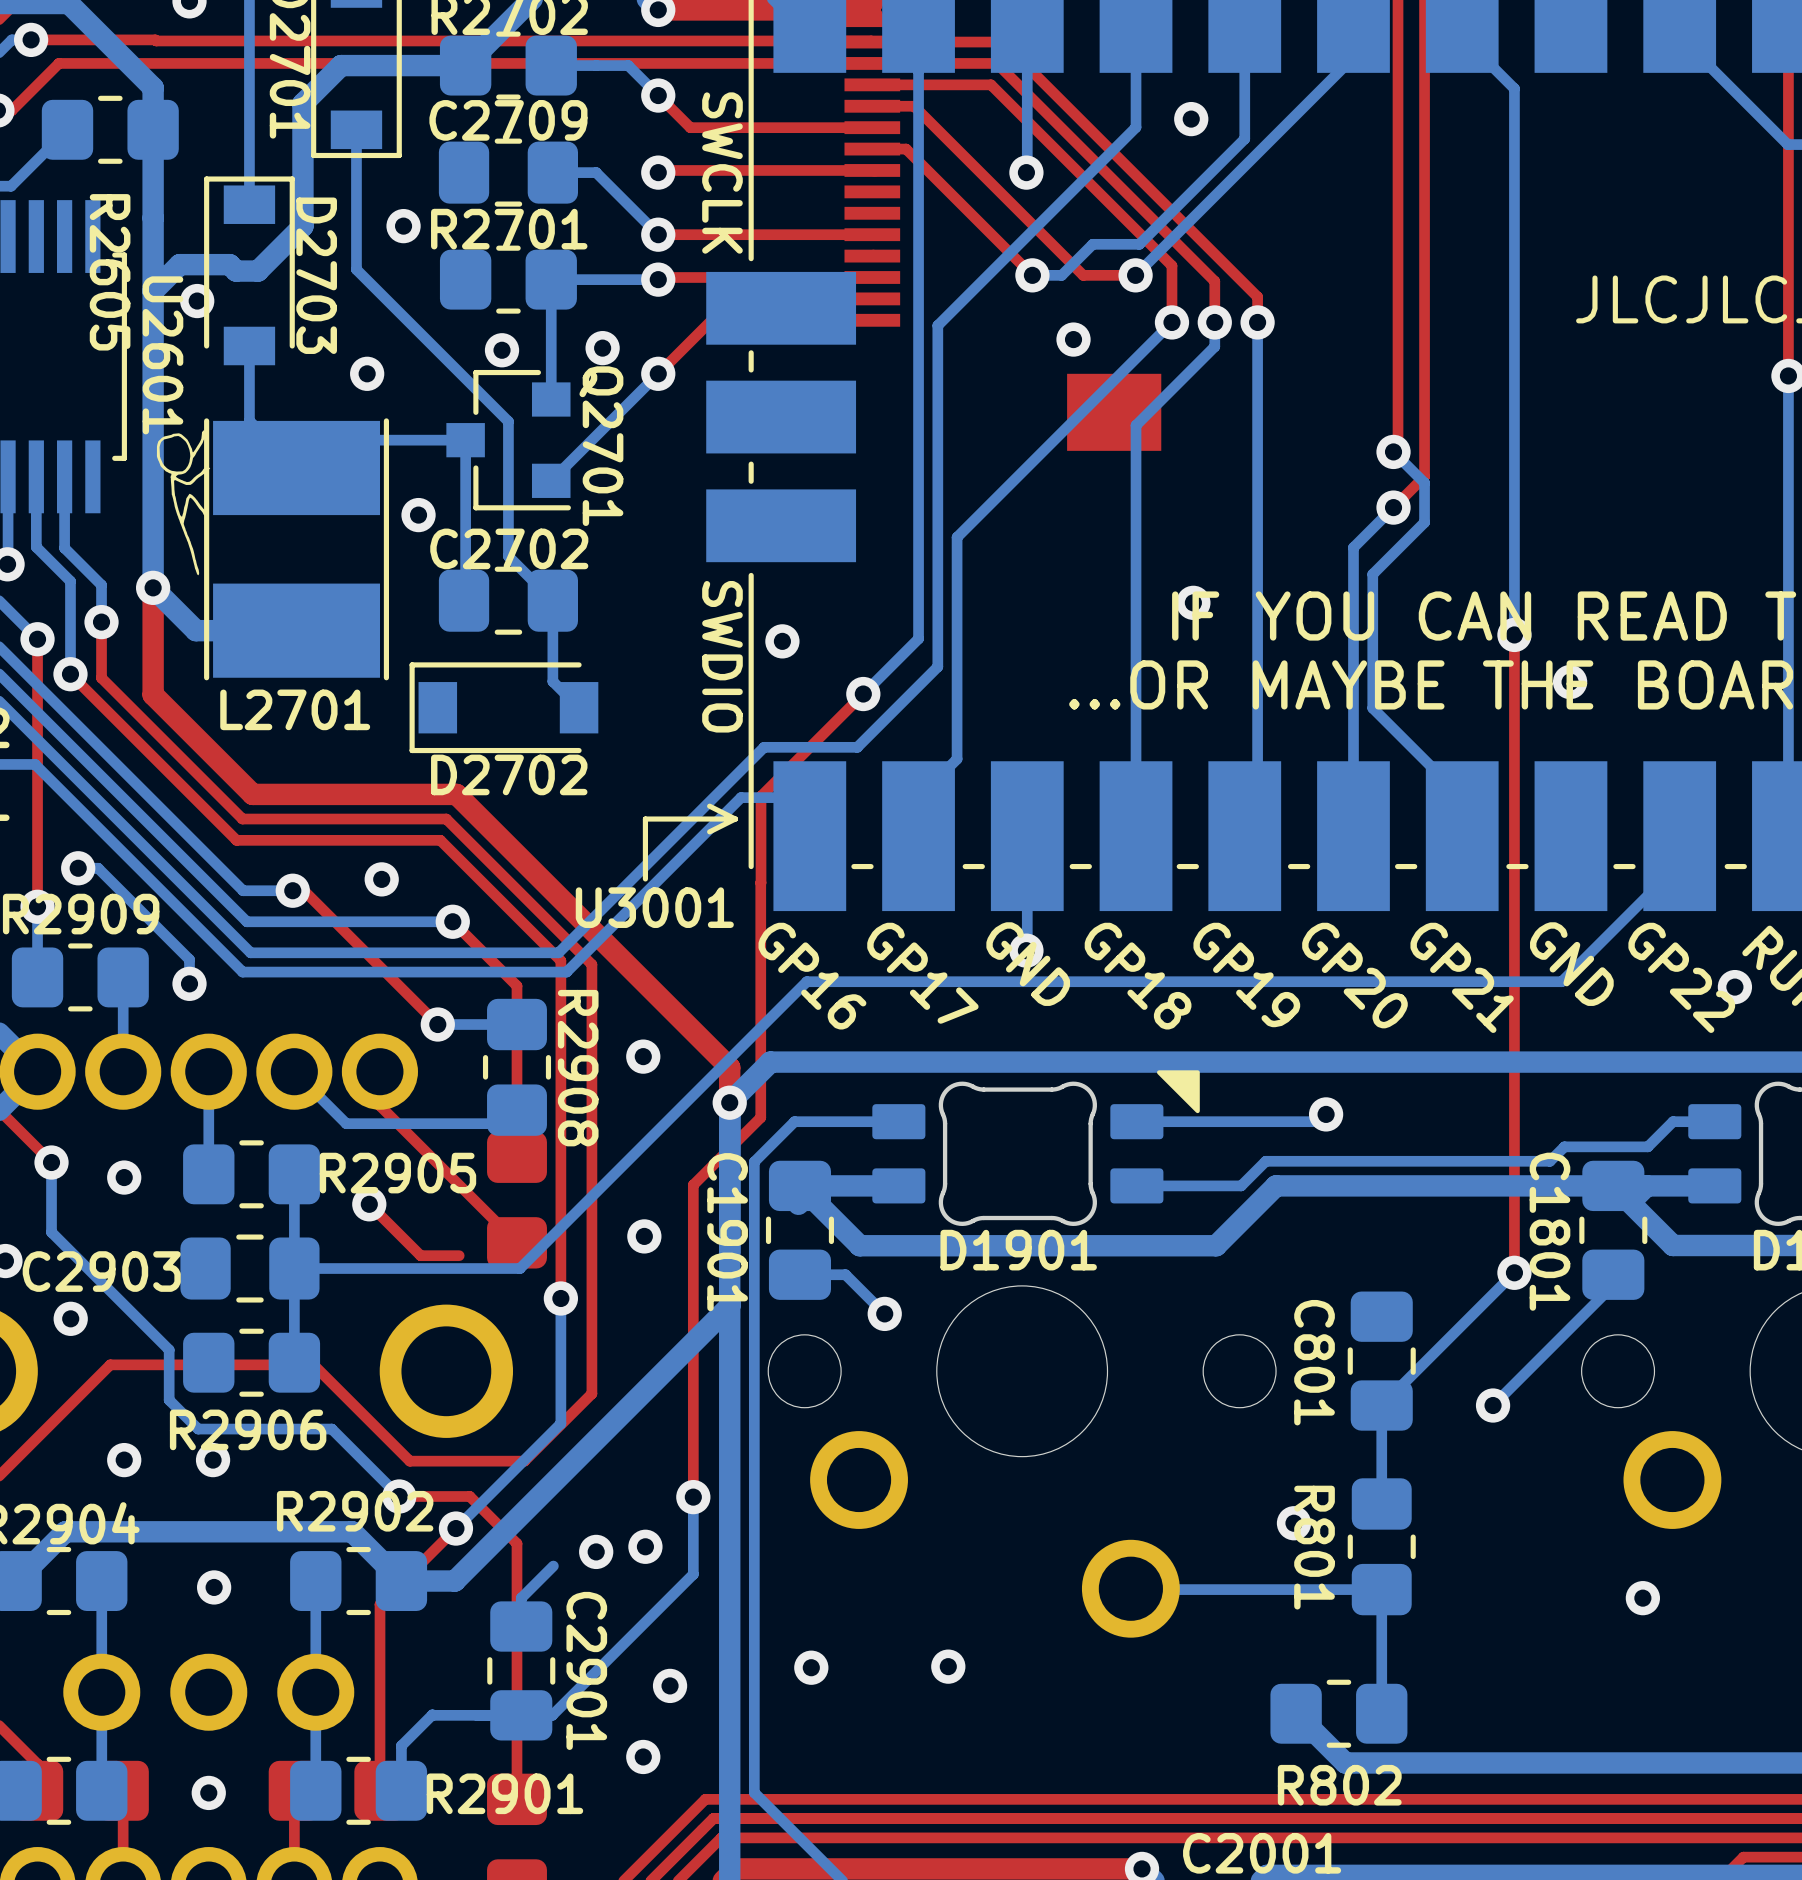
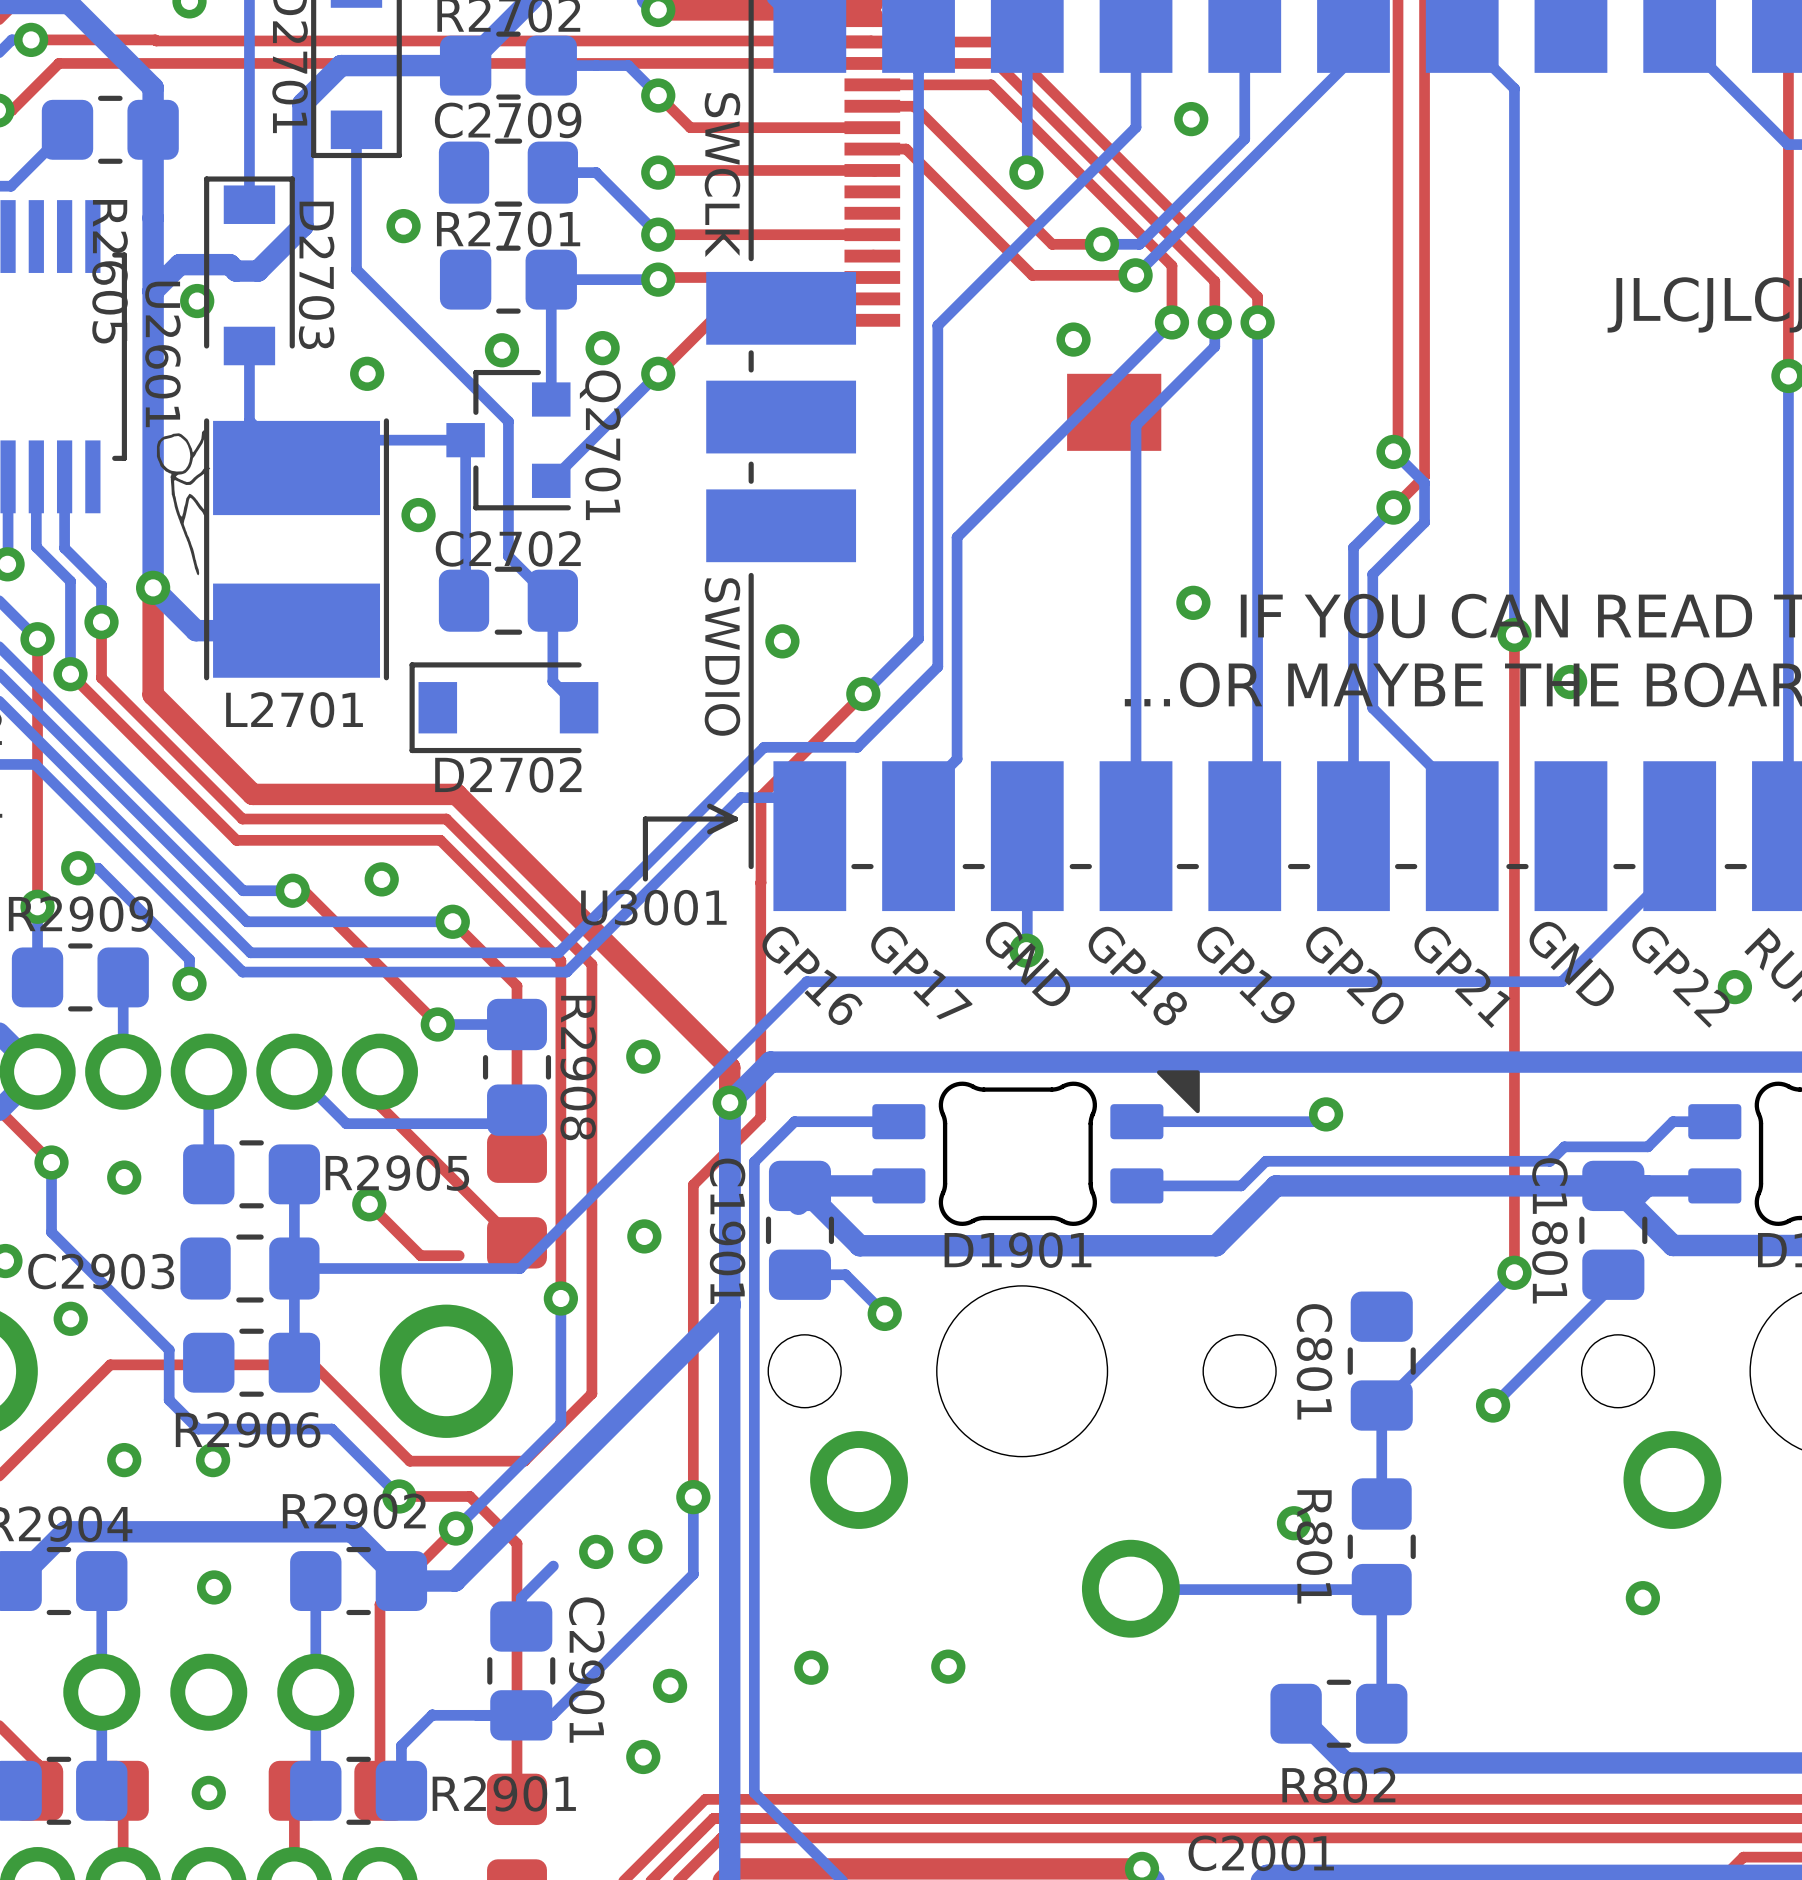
top track: (1052, 244) (1083, 275) -> (1052, 244) (1101, 244)
bottom track: (1101, 244) (1092, 244) (1061, 275) (1032, 275) -> none
via position: (1032, 275) -> (1101, 244)
top track: none -> (1083, 275) (1032, 275)

